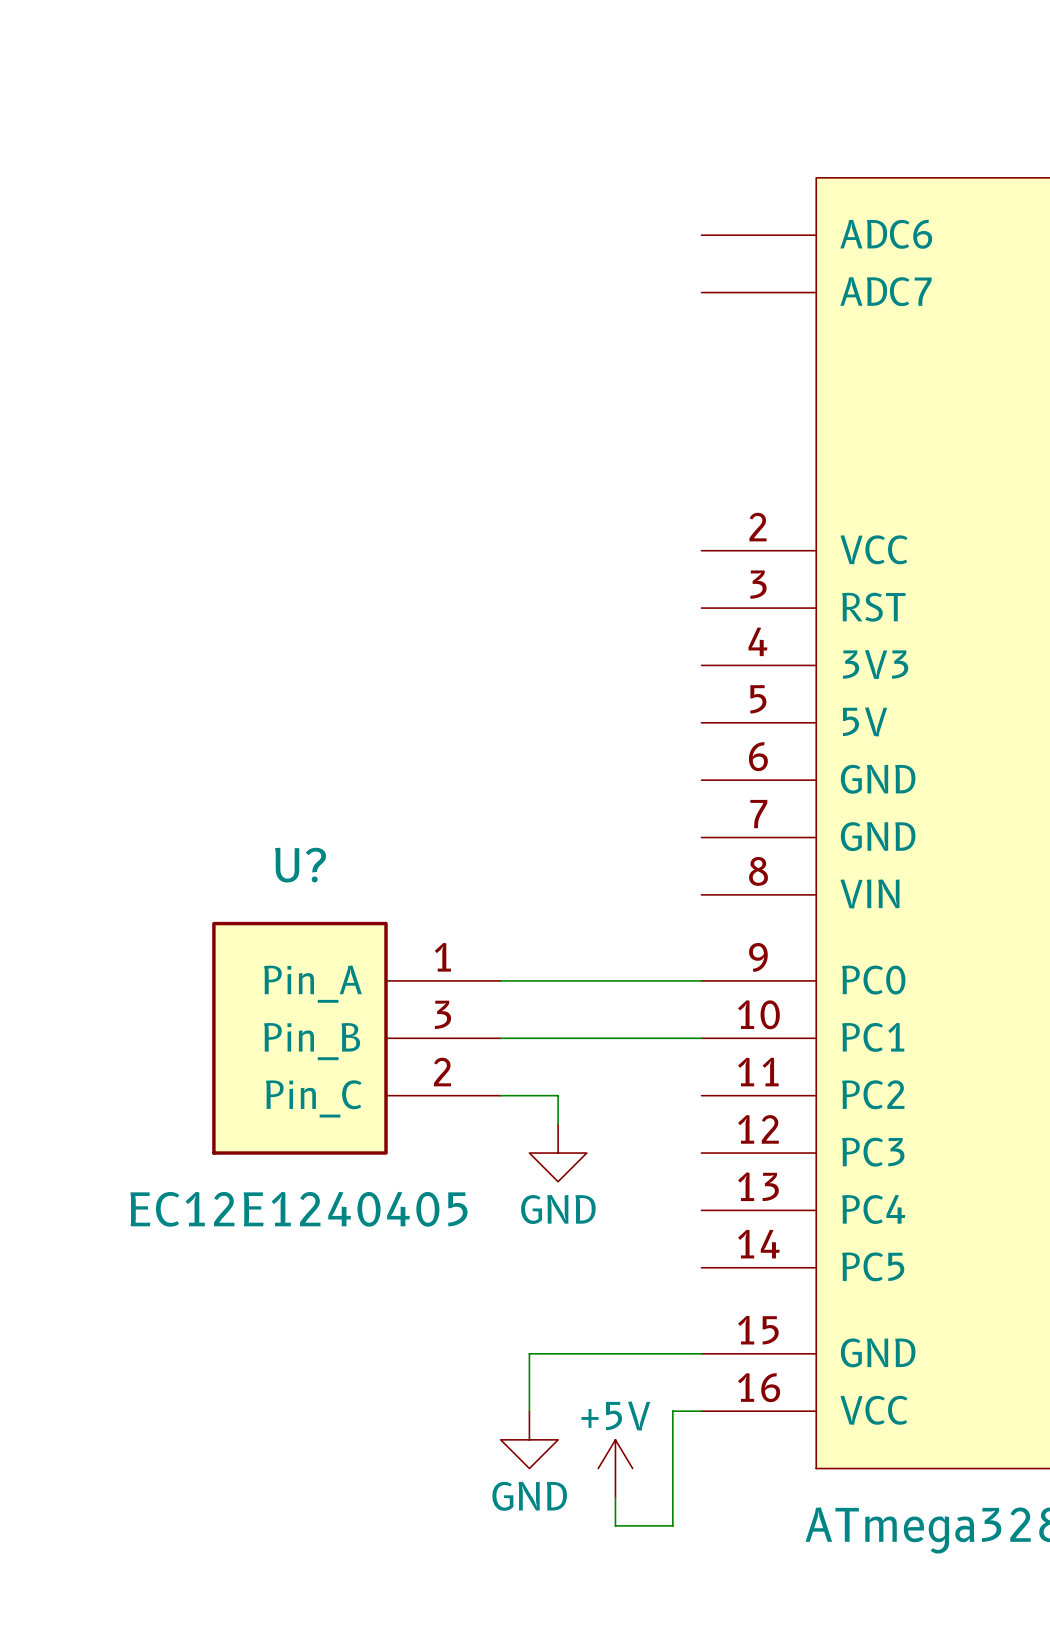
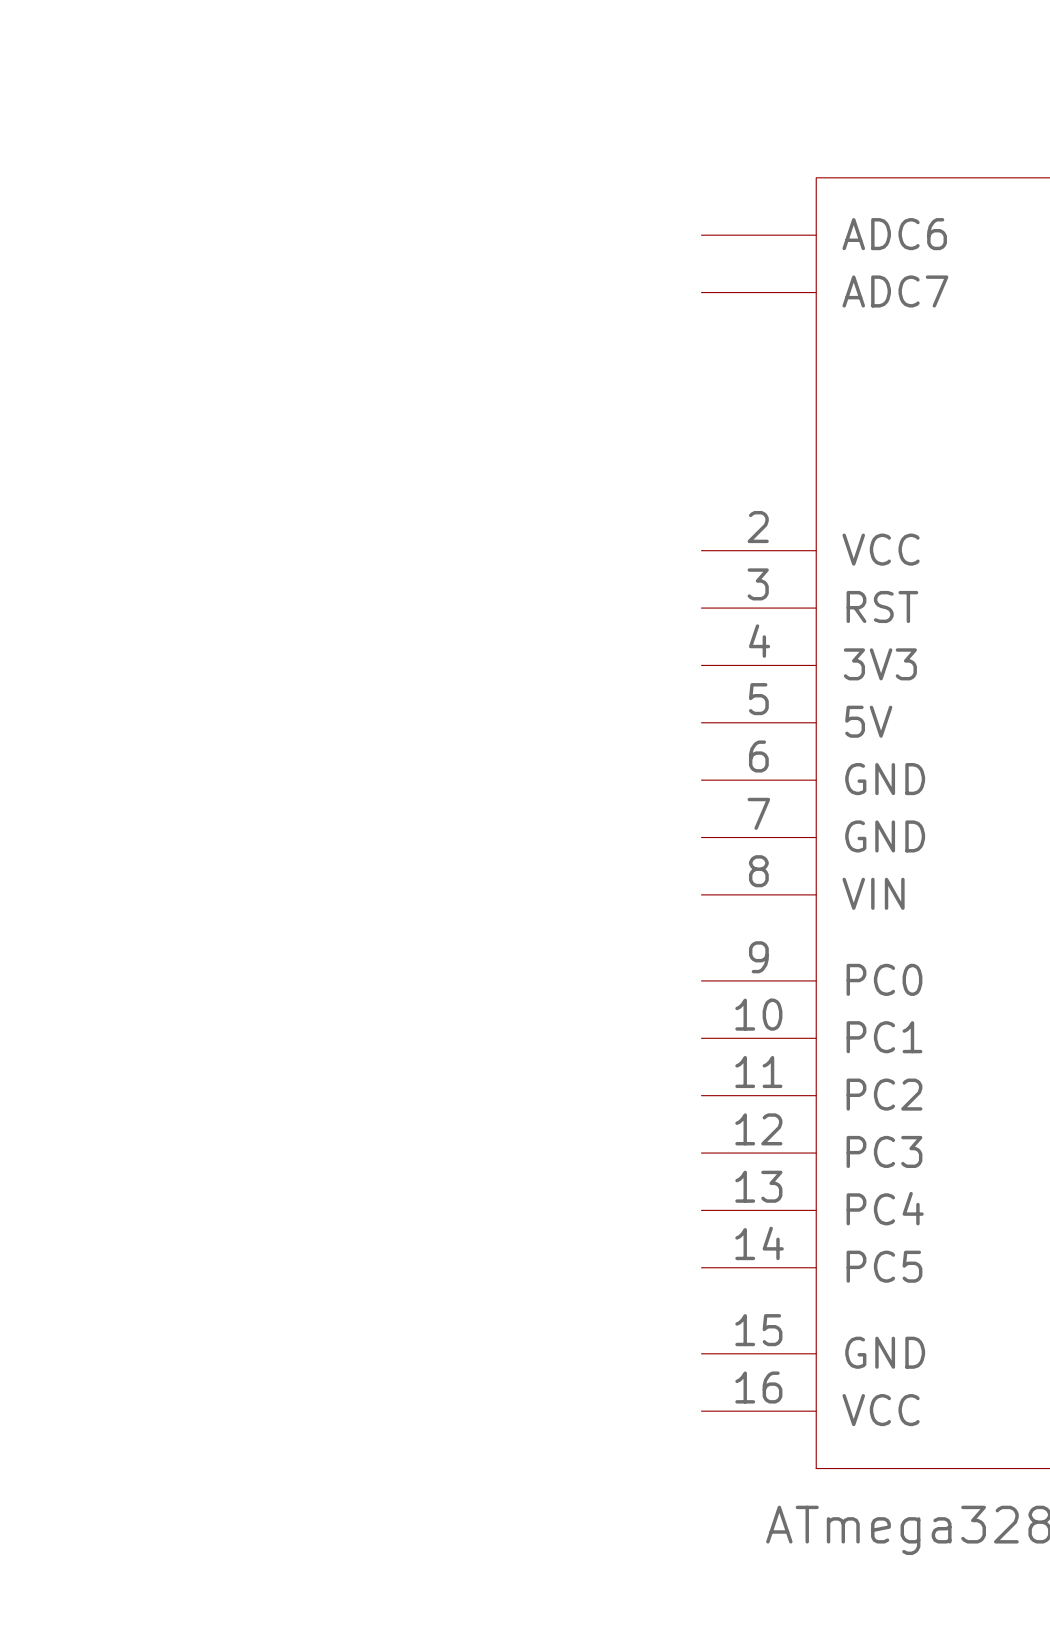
wire: (500, 980) (701, 980) -> none
U?: EC12E1240405 (356, 1038) -> none
wire: (500, 1038) (701, 1038) -> none
wire: (500, 1095) (558, 1095) (558, 1124) -> none
power symbol: GND (558, 1153) -> none
wire: (701, 1353) (529, 1353) (529, 1411) -> none
wire: (701, 1411) (672, 1411) (672, 1525) (615, 1525) (615, 1497) -> none
power symbol: GND (529, 1439) -> none
power symbol: +5V (615, 1468) -> none

